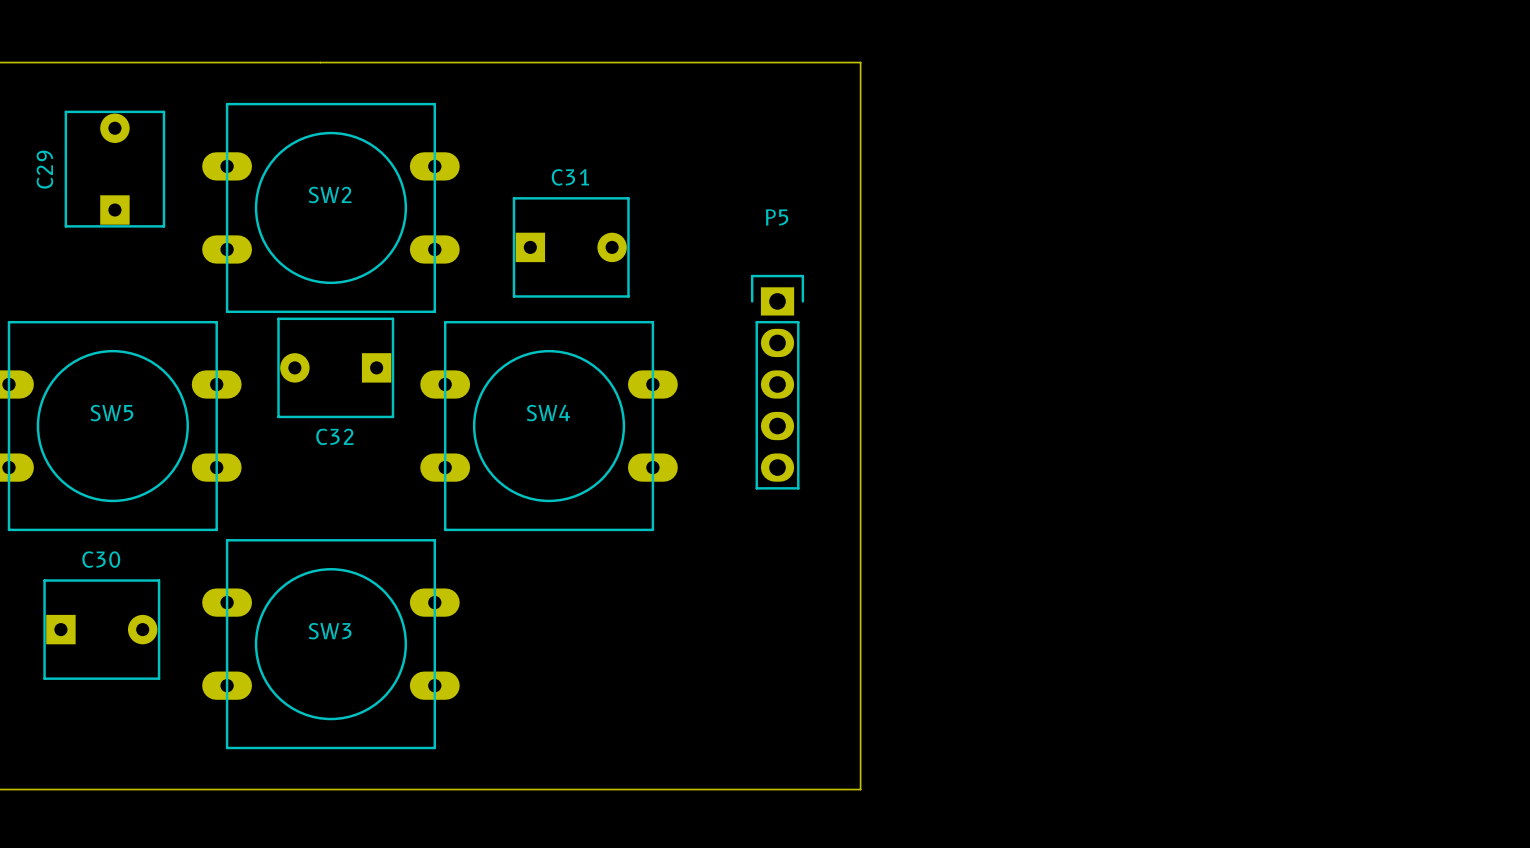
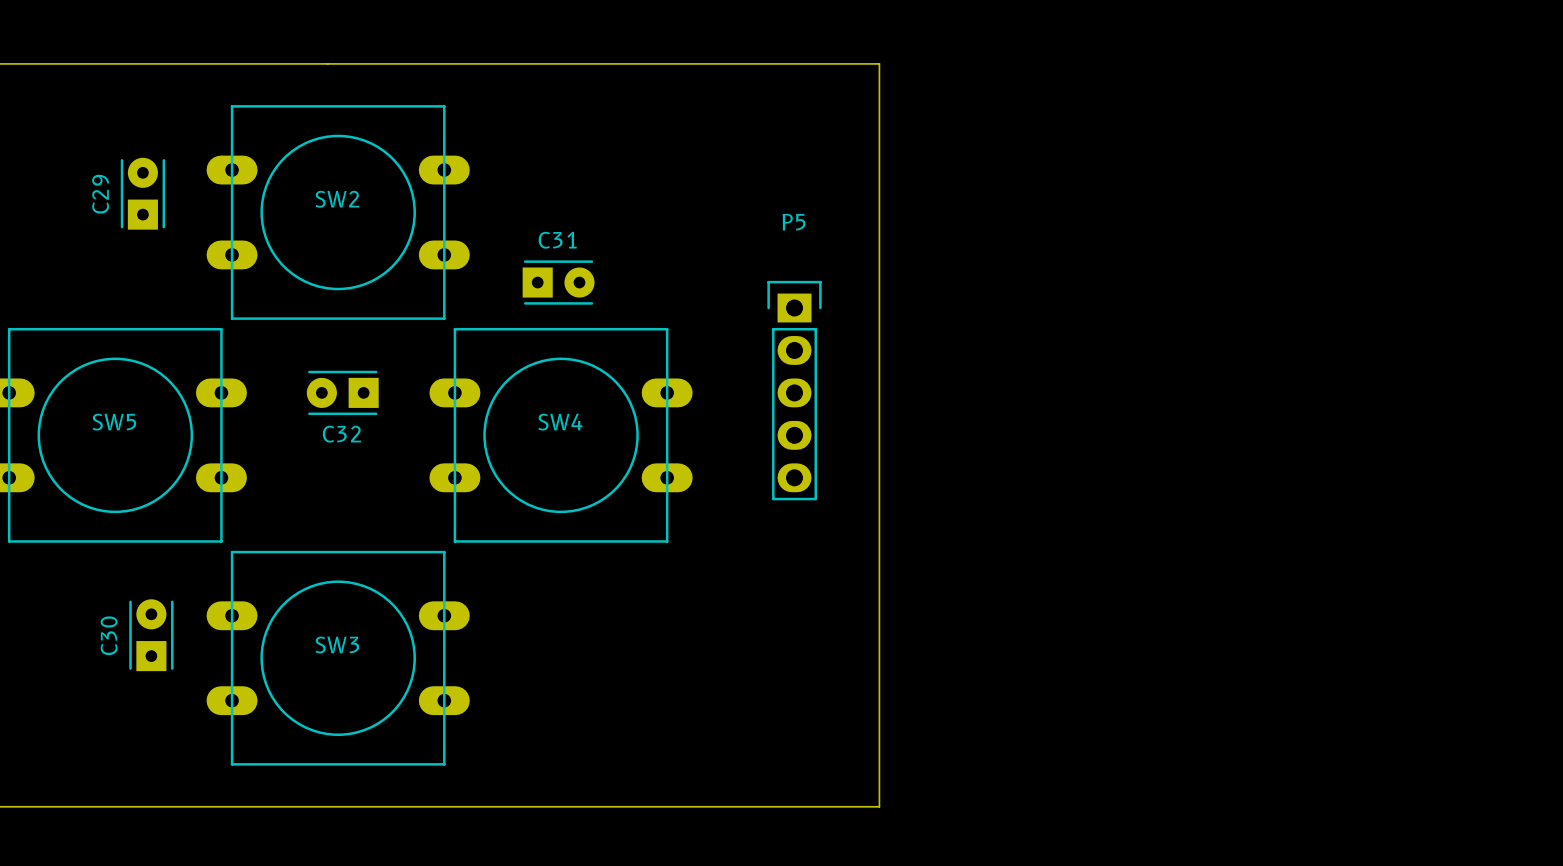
C29 footprint: [64, 110, 166, 228] -> [120, 157, 166, 230]
C31 footprint: [512, 197, 630, 298] -> [522, 260, 595, 305]
C32 footprint: [277, 317, 395, 419] -> [306, 370, 379, 416]
C30 name position: C30 (101, 559) -> C30 (109, 635)
C30 footprint: [43, 579, 161, 680] -> [129, 599, 174, 672]

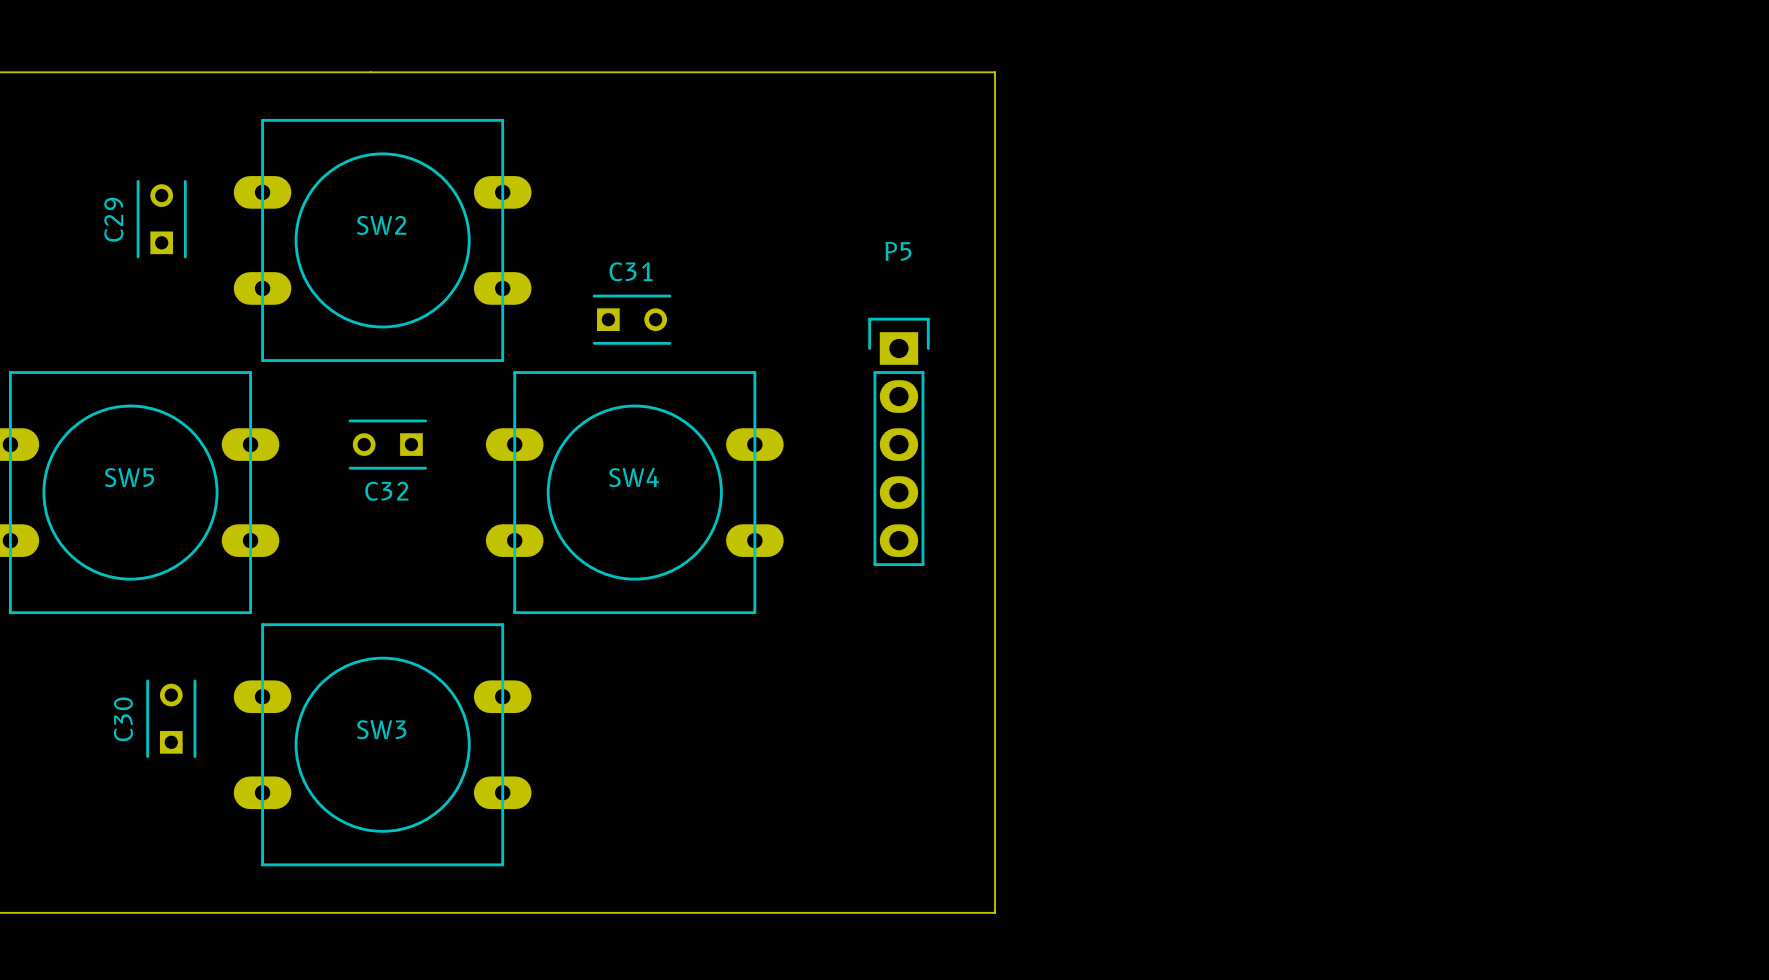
C29 footprint: [120, 157, 166, 230] -> [136, 179, 187, 259]
C31 footprint: [522, 260, 595, 305] -> [592, 294, 672, 345]
C32 footprint: [306, 370, 379, 416] -> [348, 419, 428, 470]
C30 footprint: [129, 599, 174, 672] -> [146, 679, 197, 758]

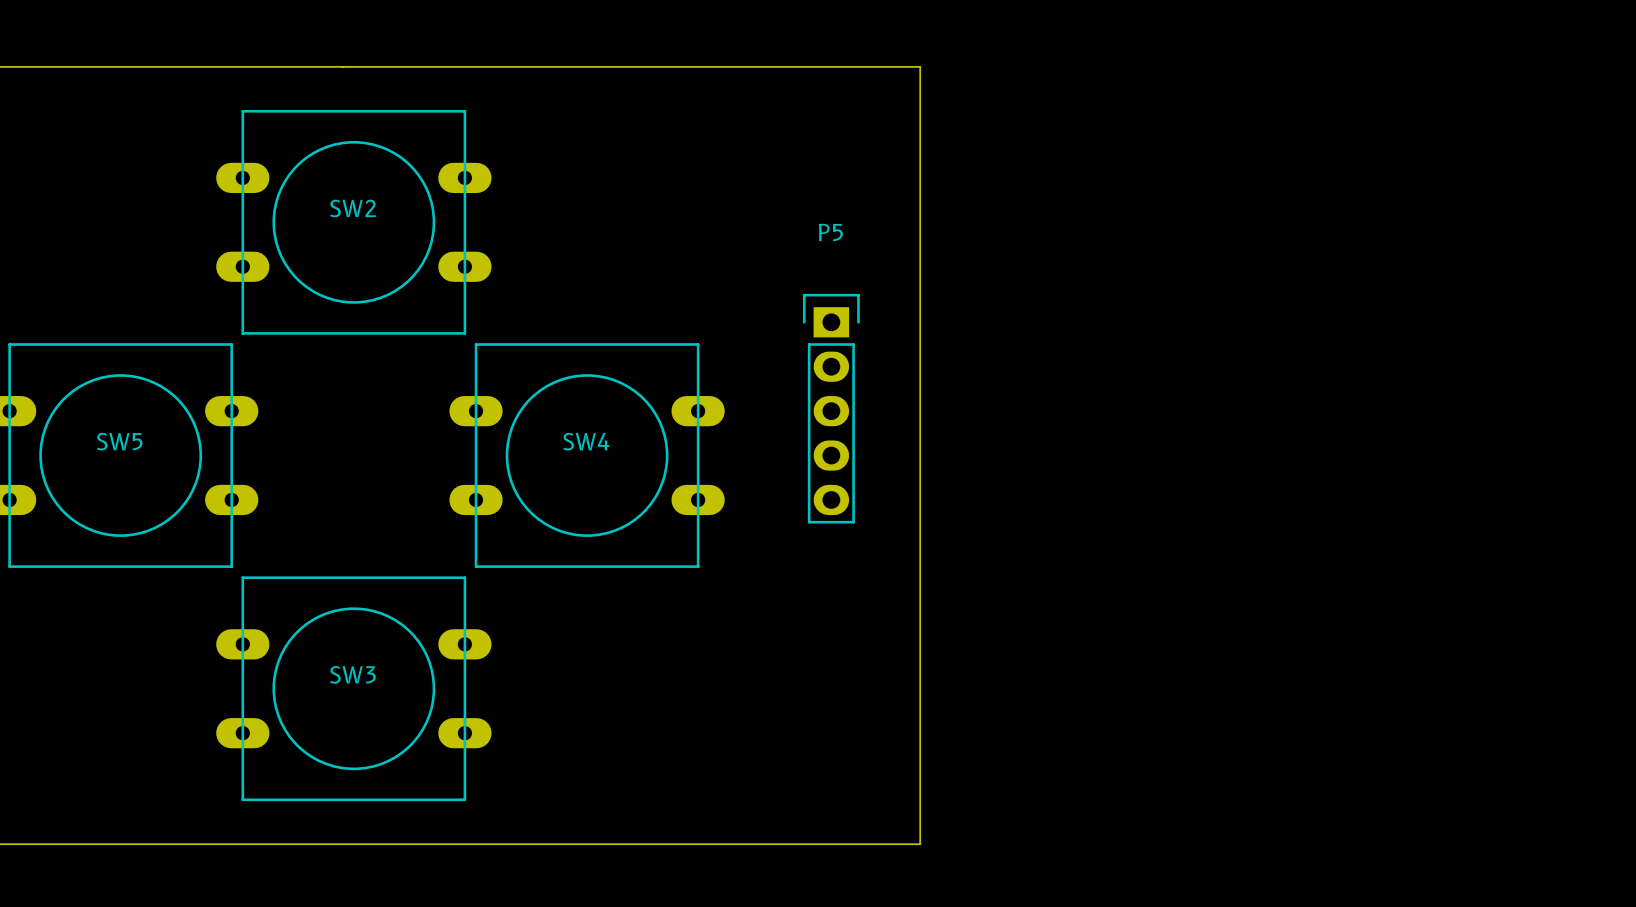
C29: (161, 219) -> none
C31: (632, 319) -> none
C32: (387, 444) -> none
C30: (171, 718) -> none

